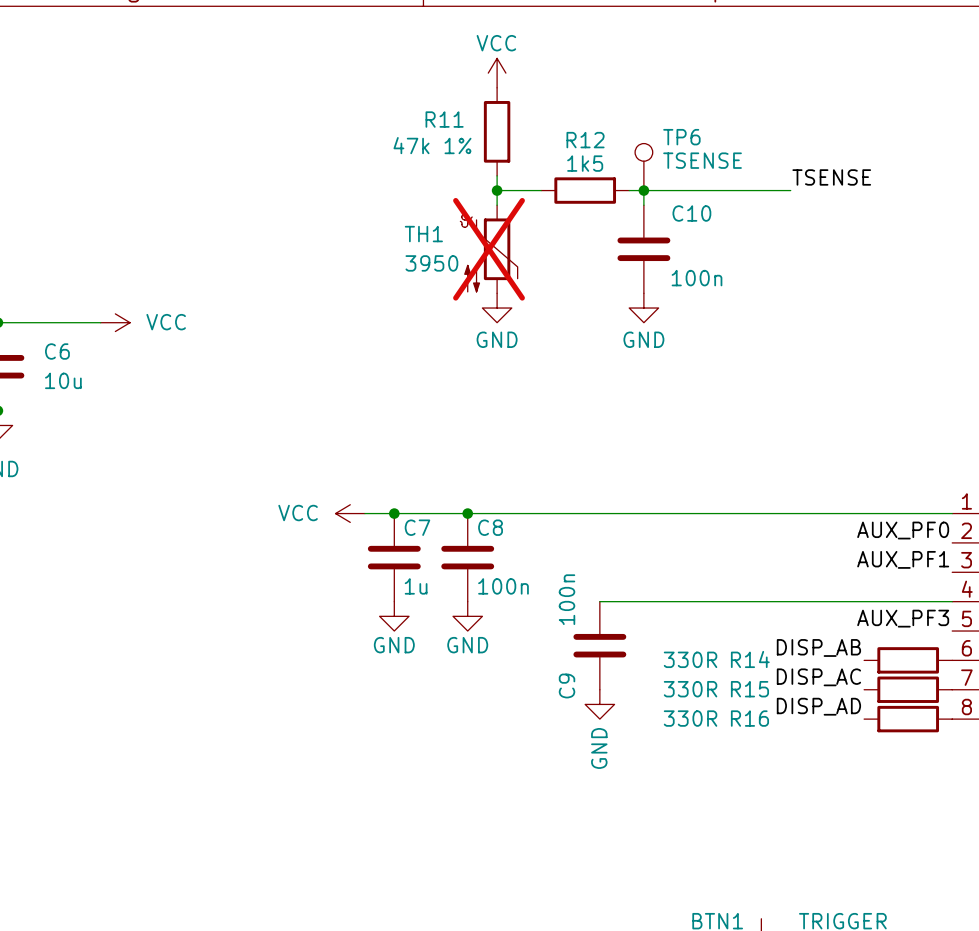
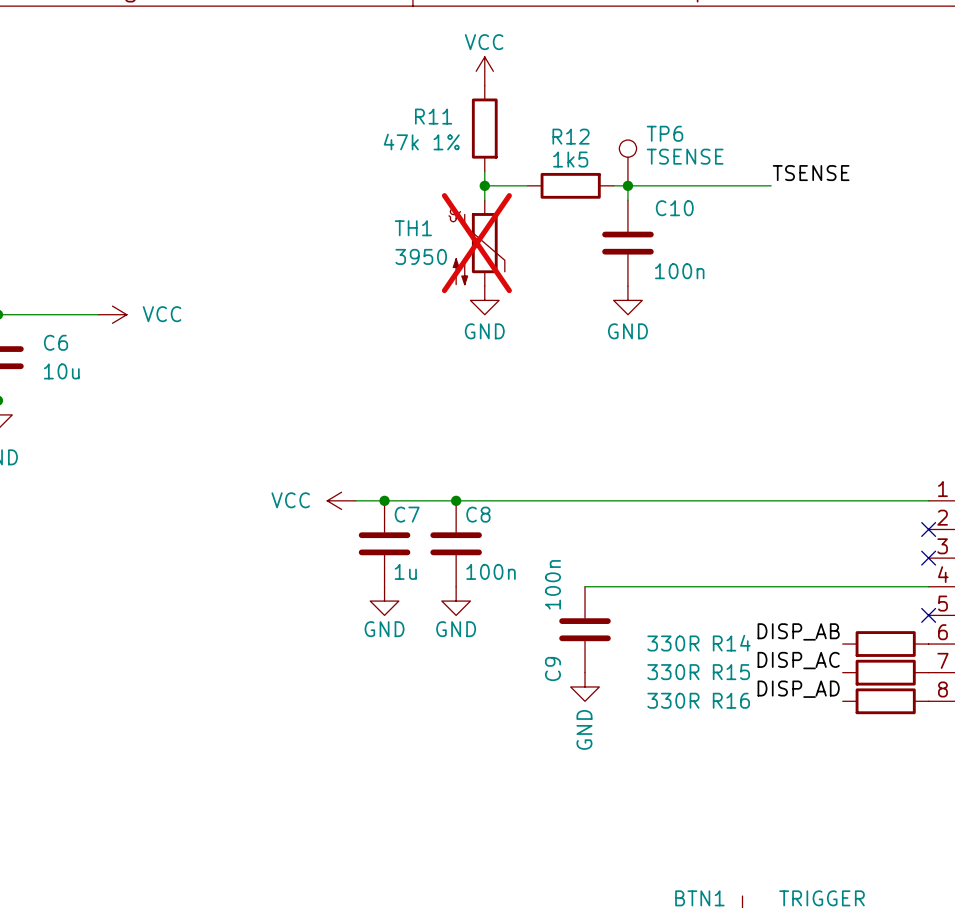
label: AUX_PF0 (903, 530) -> none
no-connect mark: none -> (928, 529)
label: AUX_PF1 (903, 559) -> none
no-connect mark: none -> (928, 558)
label: AUX_PF3 (903, 618) -> none
no-connect mark: none -> (928, 615)

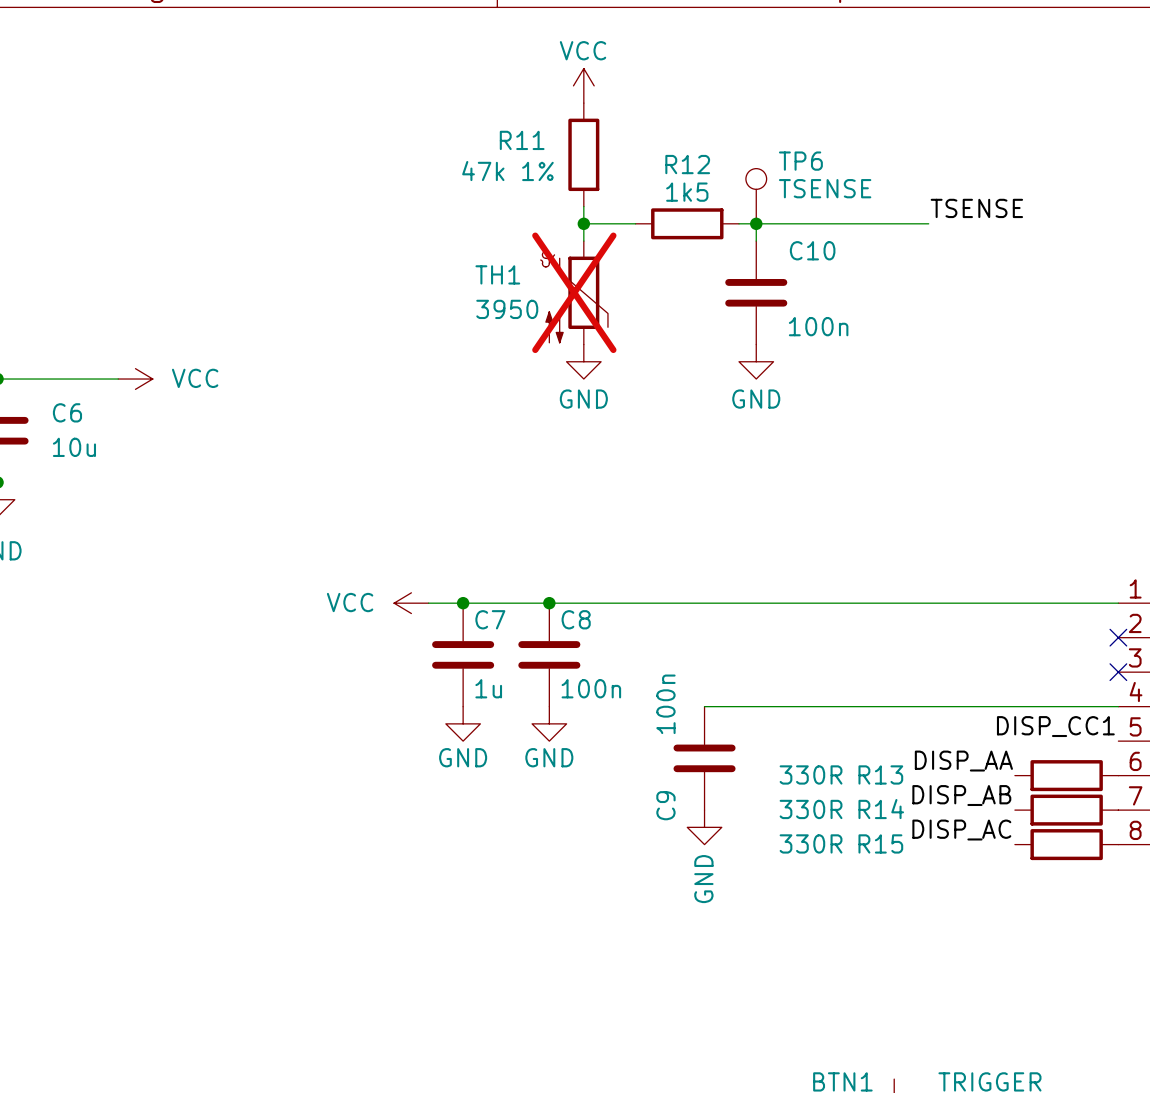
label: none -> DISP_CC1 (1055, 726)
no-connect mark: (928, 615) -> none
label: DISP_AB (798, 631) -> DISP_AA (963, 761)
R14 name: R14 (731, 643) -> R13 (880, 774)
label: DISP_AC (798, 660) -> DISP_AB (961, 795)
R15 name: R15 (731, 672) -> R14 (881, 809)
label: DISP_AD (798, 689) -> DISP_AC (961, 830)
R16 name: R16 (731, 700) -> R15 (880, 843)

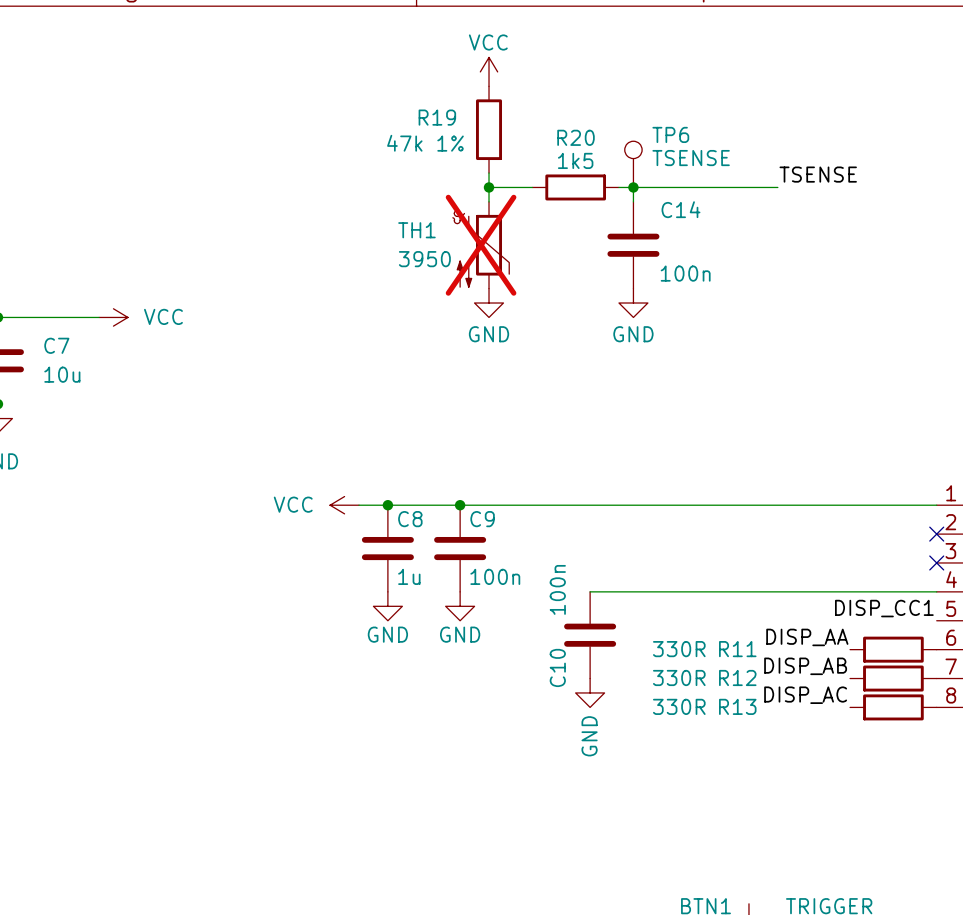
R11 name: R11 (522, 140) -> R19 (437, 117)
R12 name: R12 (687, 164) -> R20 (576, 137)
C10 name: C10 (812, 250) -> C14 (680, 209)
C6 name: C6 (67, 412) -> C7 (56, 345)
C7 name: C7 (490, 619) -> C8 (410, 519)
C8 name: C8 (576, 619) -> C9 (482, 519)
R13 name: R13 (880, 774) -> R11 (737, 649)
C9 name: C9 (665, 805) -> C10 (557, 667)
R14 name: R14 (881, 809) -> R12 (737, 677)
R15 name: R15 (880, 843) -> R13 (737, 706)

